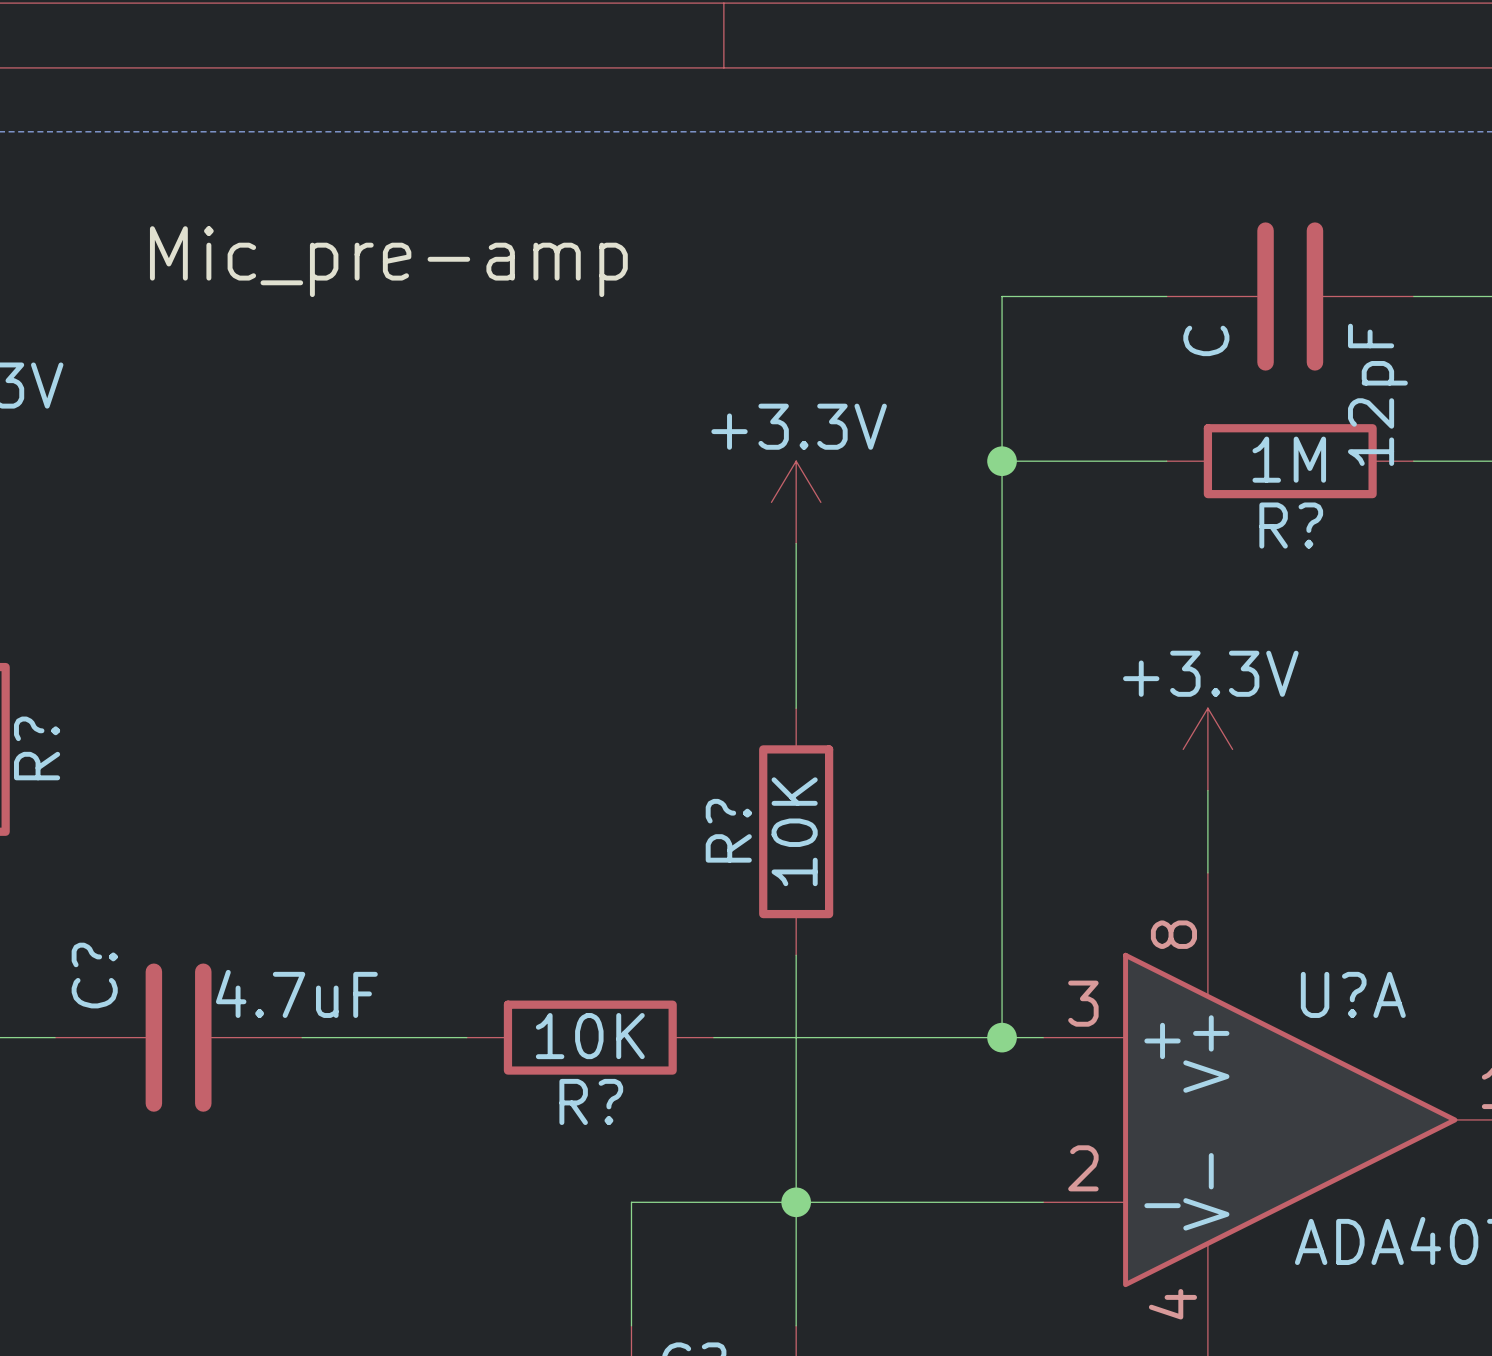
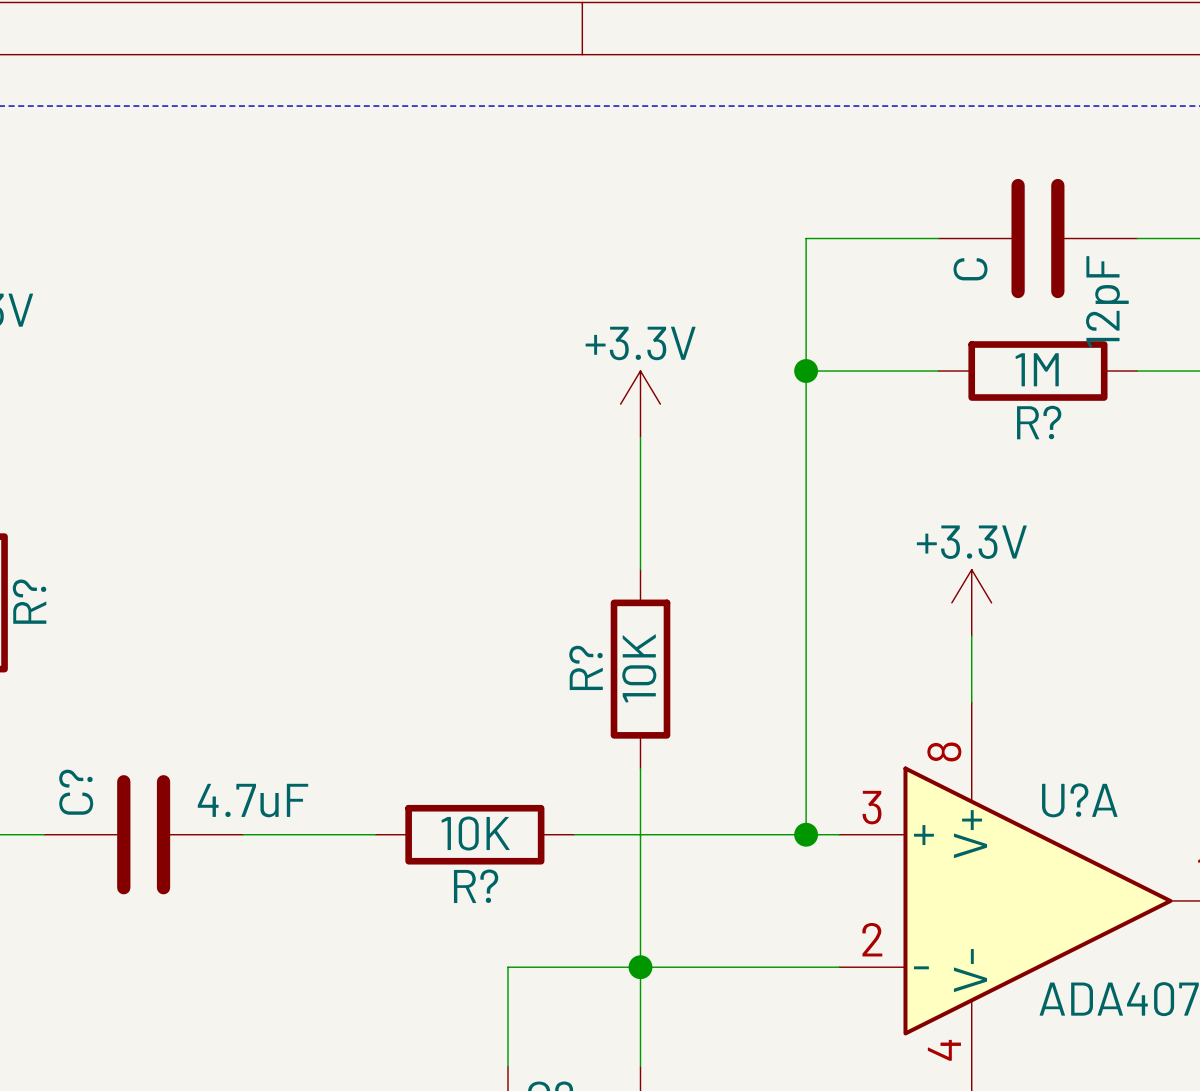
label: Mic_pre-amp (388, 261) -> none

